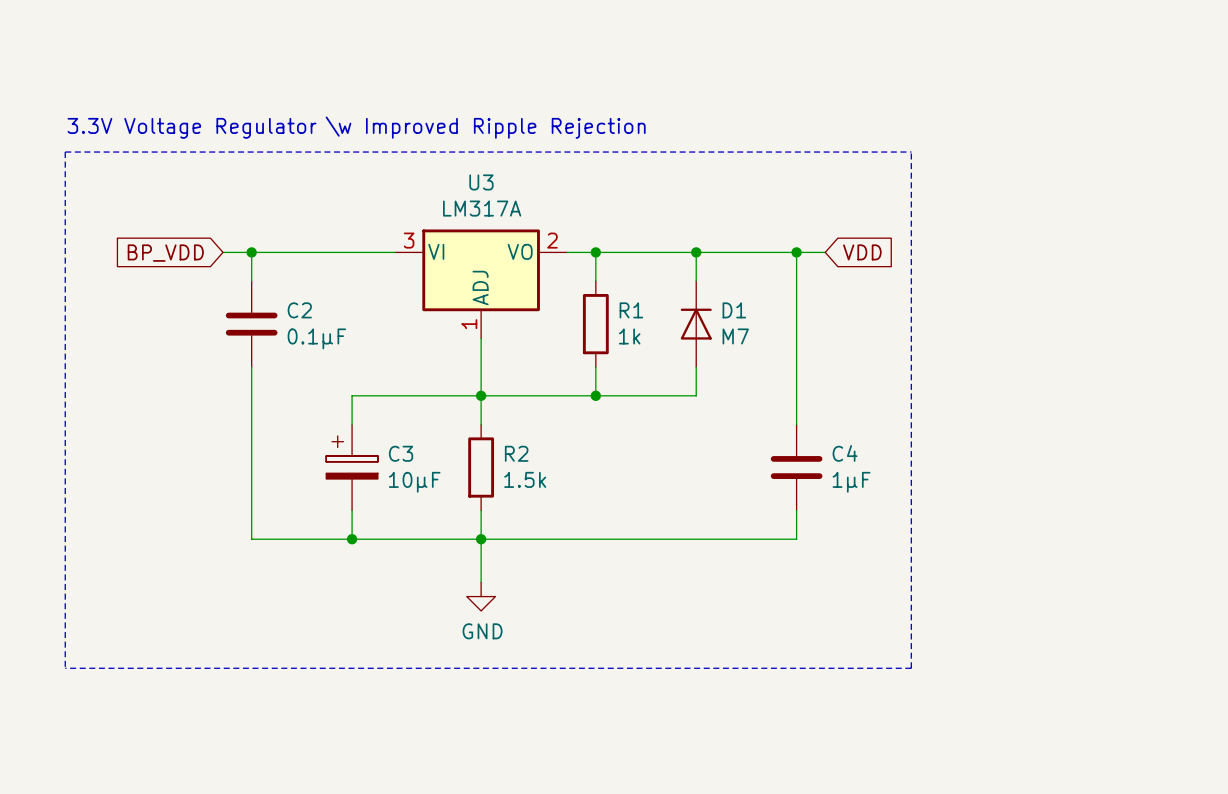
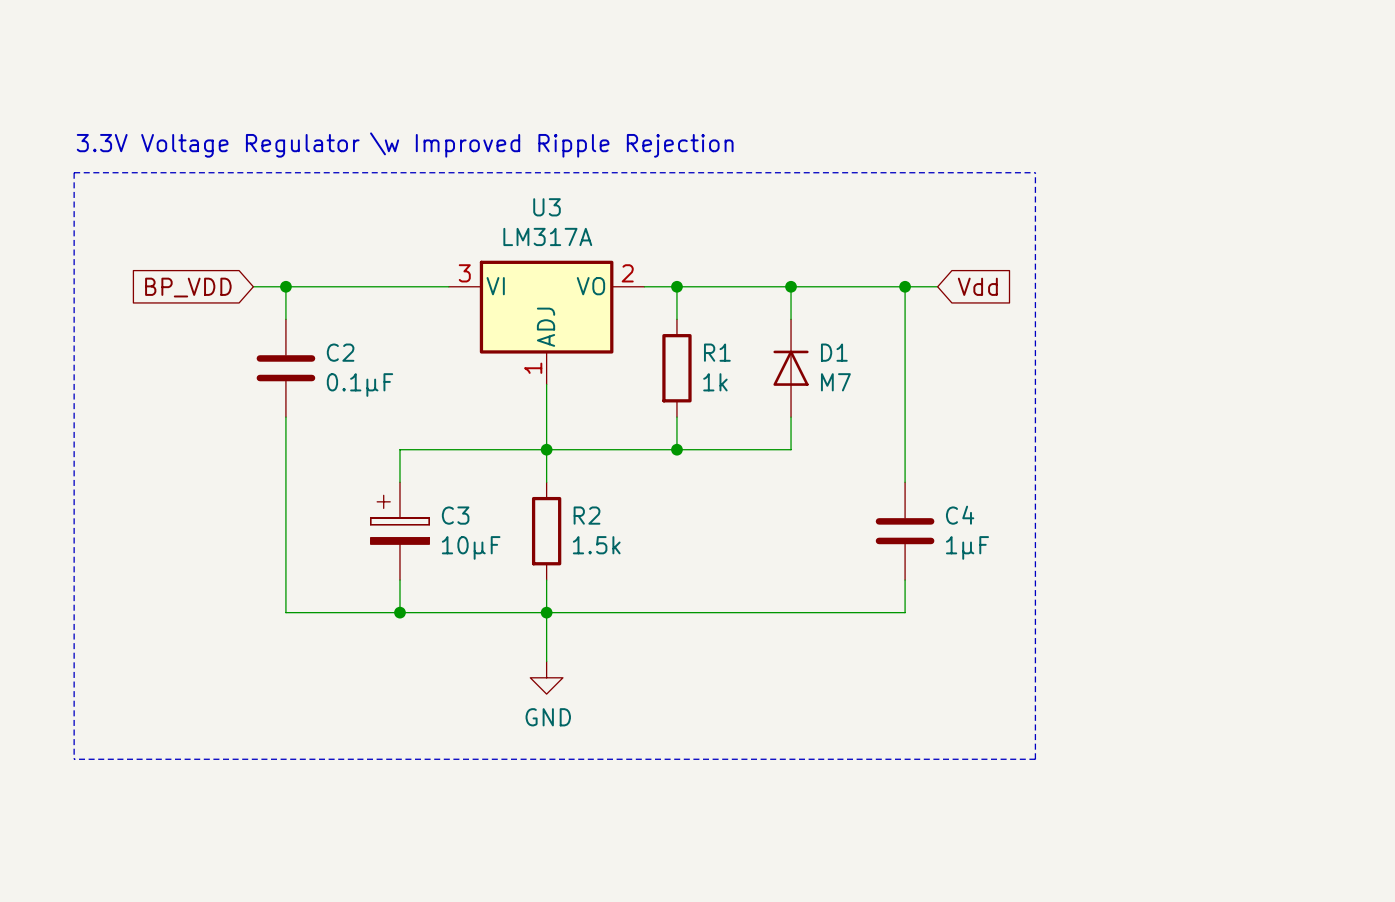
global label: VDD (862, 252) -> Vdd (977, 286)

